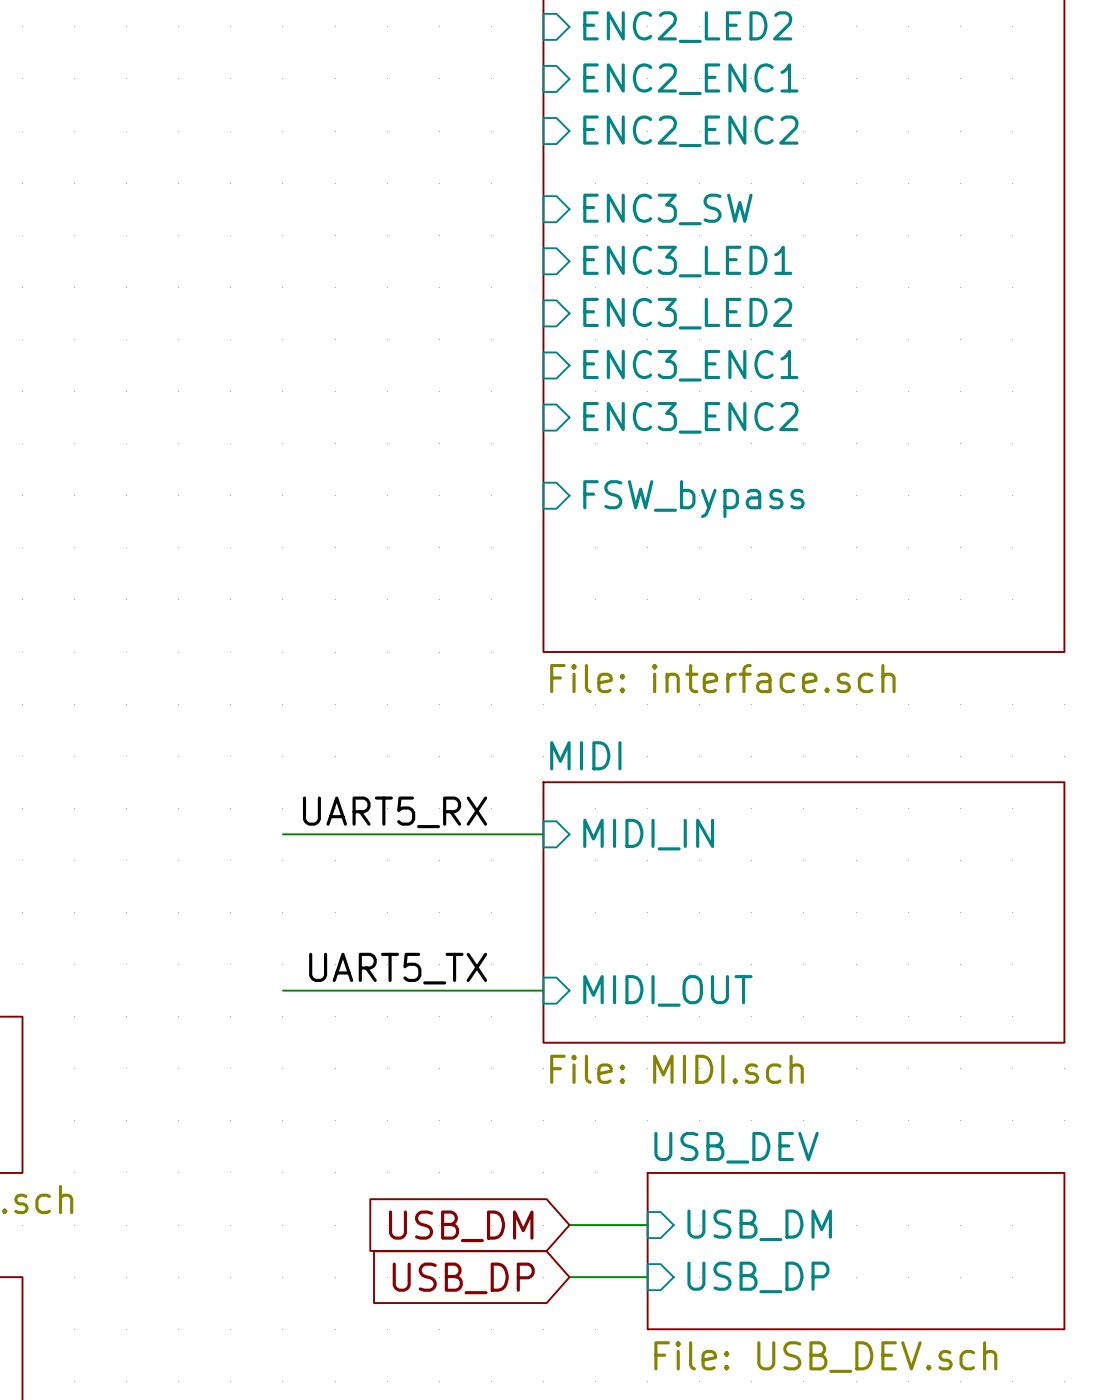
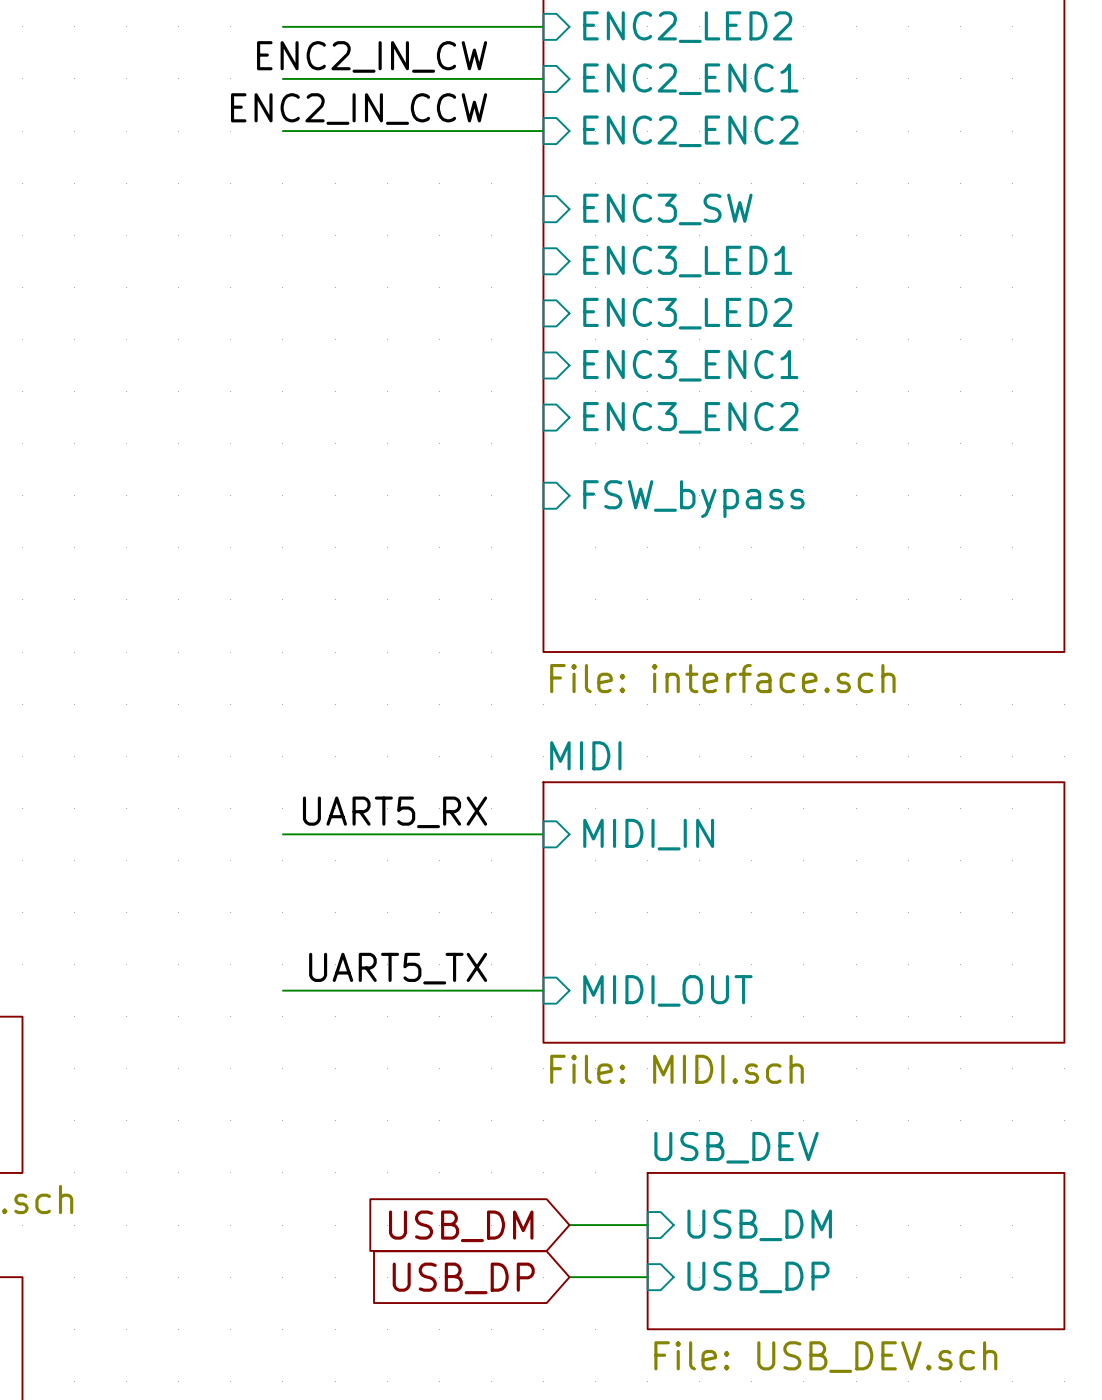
wire: none -> (282, 26) (543, 26)
label: none -> ENC2_IN_CW (372, 56)
wire: none -> (282, 78) (543, 78)
label: none -> ENC2_IN_CCW (359, 109)
wire: none -> (282, 131) (543, 131)

